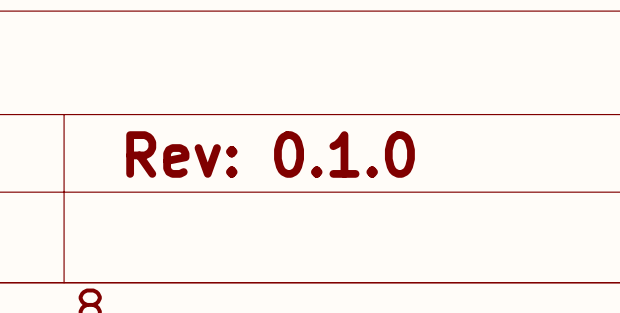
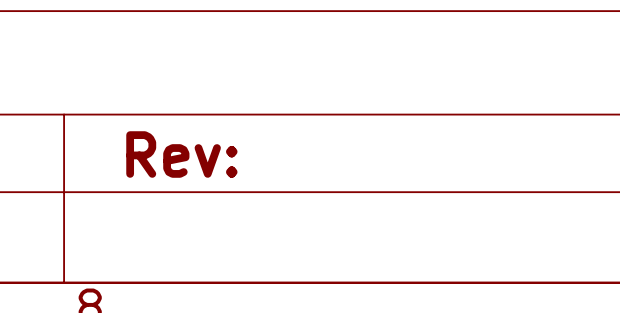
title block: Rev: 0.1.0 (270, 154) -> Rev: (181, 154)

